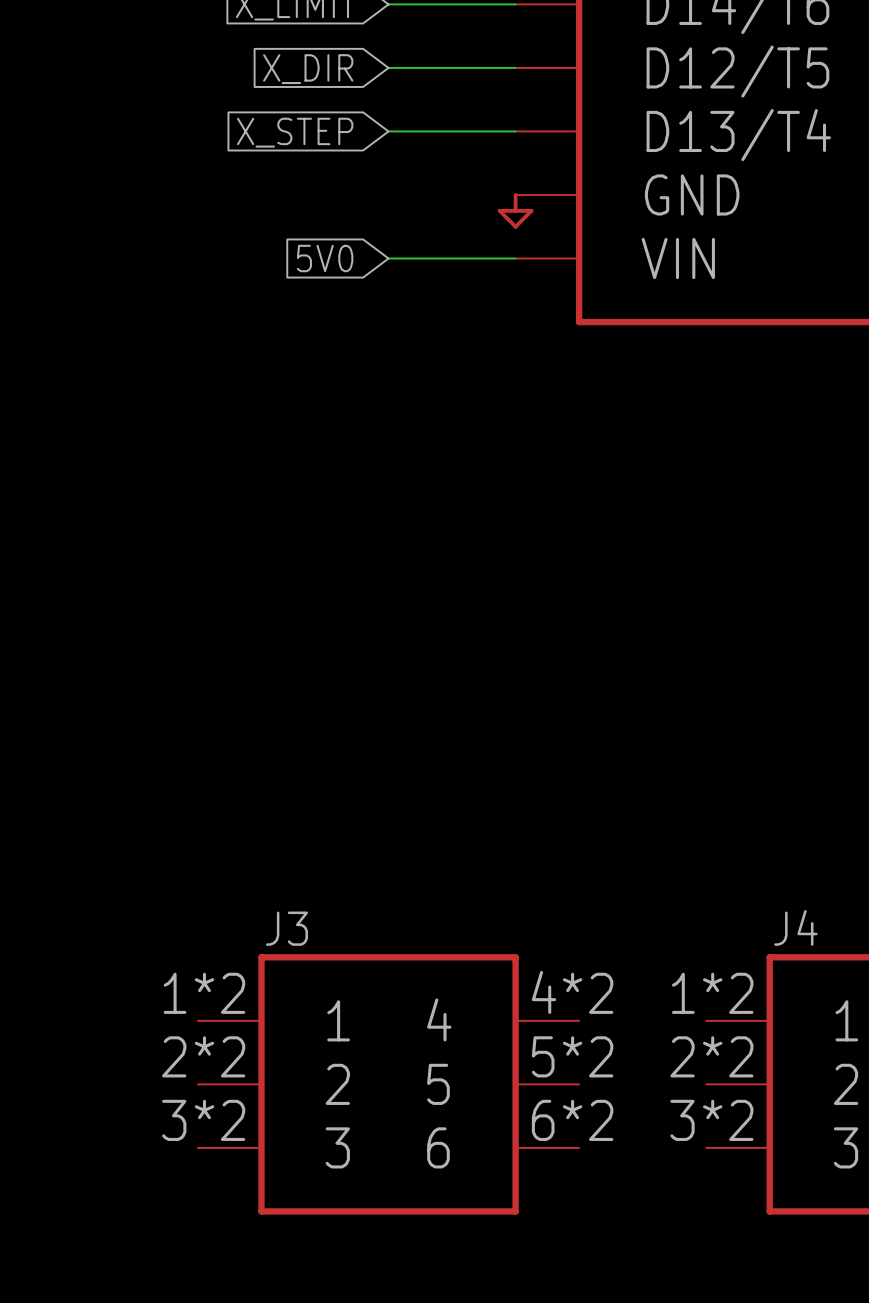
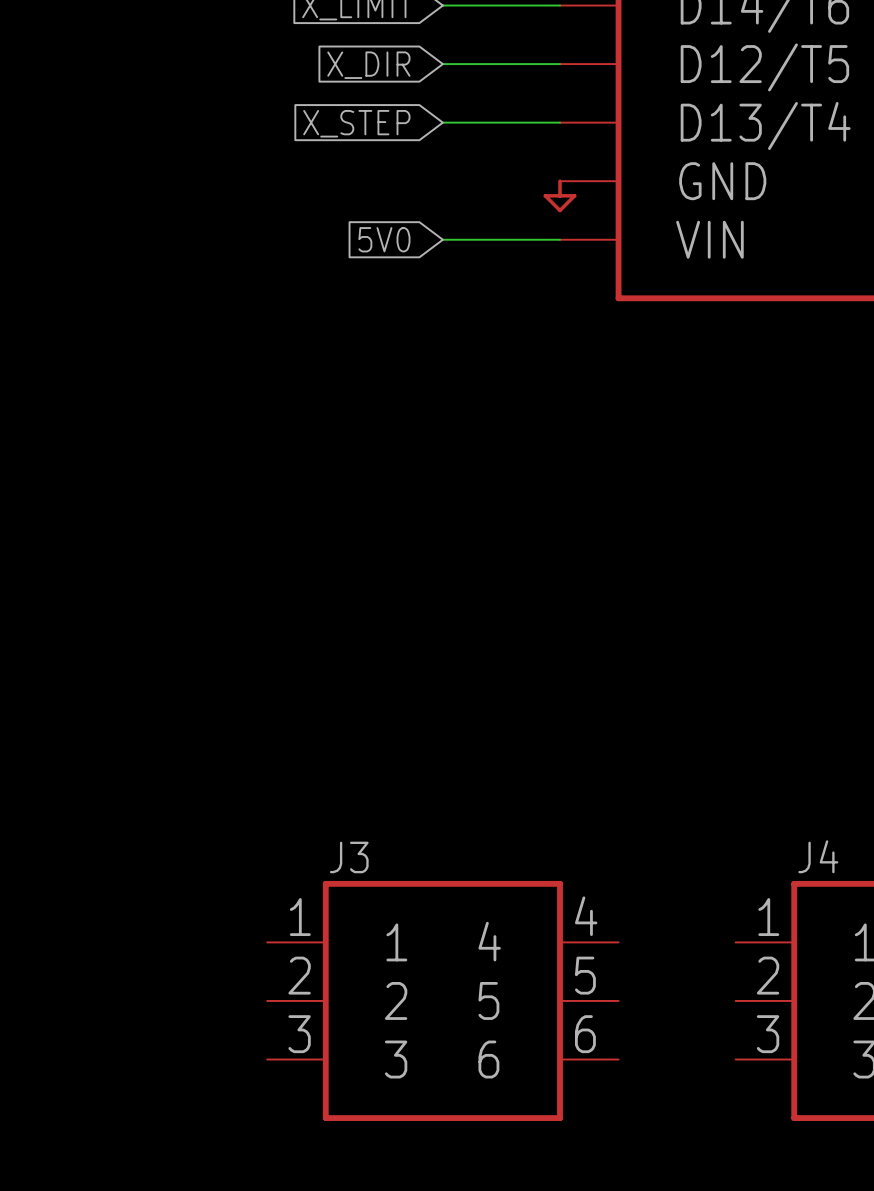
J3 pin number: 4*2 (572, 992) -> 4 (586, 916)
J3 pin number: 1*2 (204, 993) -> 1 (300, 917)
J4 pin number: 1*2 (712, 993) -> 1 (768, 917)
J3 pin number: 2*2 (203, 1056) -> 2 (299, 975)
J3 pin number: 5*2 (572, 1056) -> 5 (585, 975)
J4 pin number: 2*2 (711, 1056) -> 2 (768, 975)
J3 pin number: 3*2 (203, 1120) -> 3 (299, 1034)
J3 pin number: 6*2 (572, 1120) -> 6 (585, 1034)
J4 pin number: 3*2 (711, 1120) -> 3 (768, 1034)

